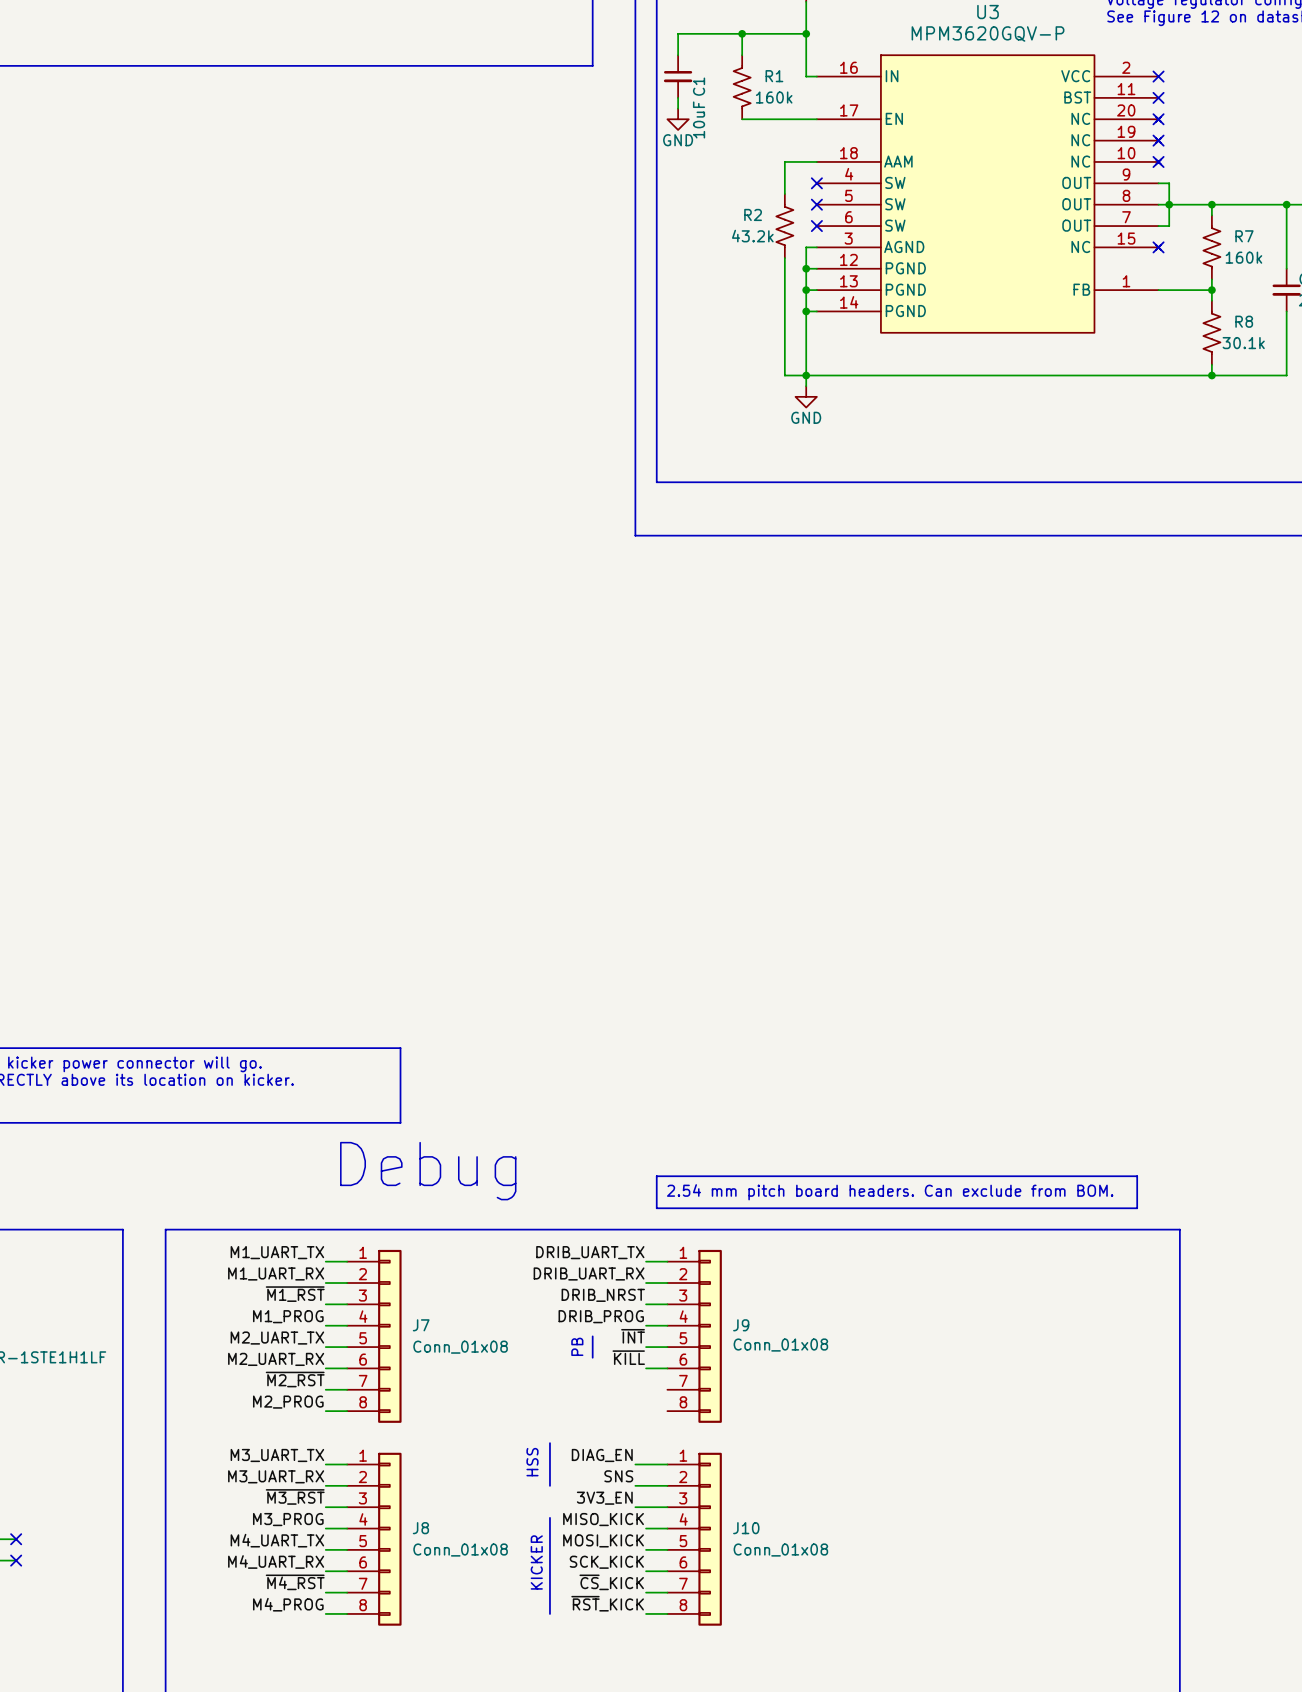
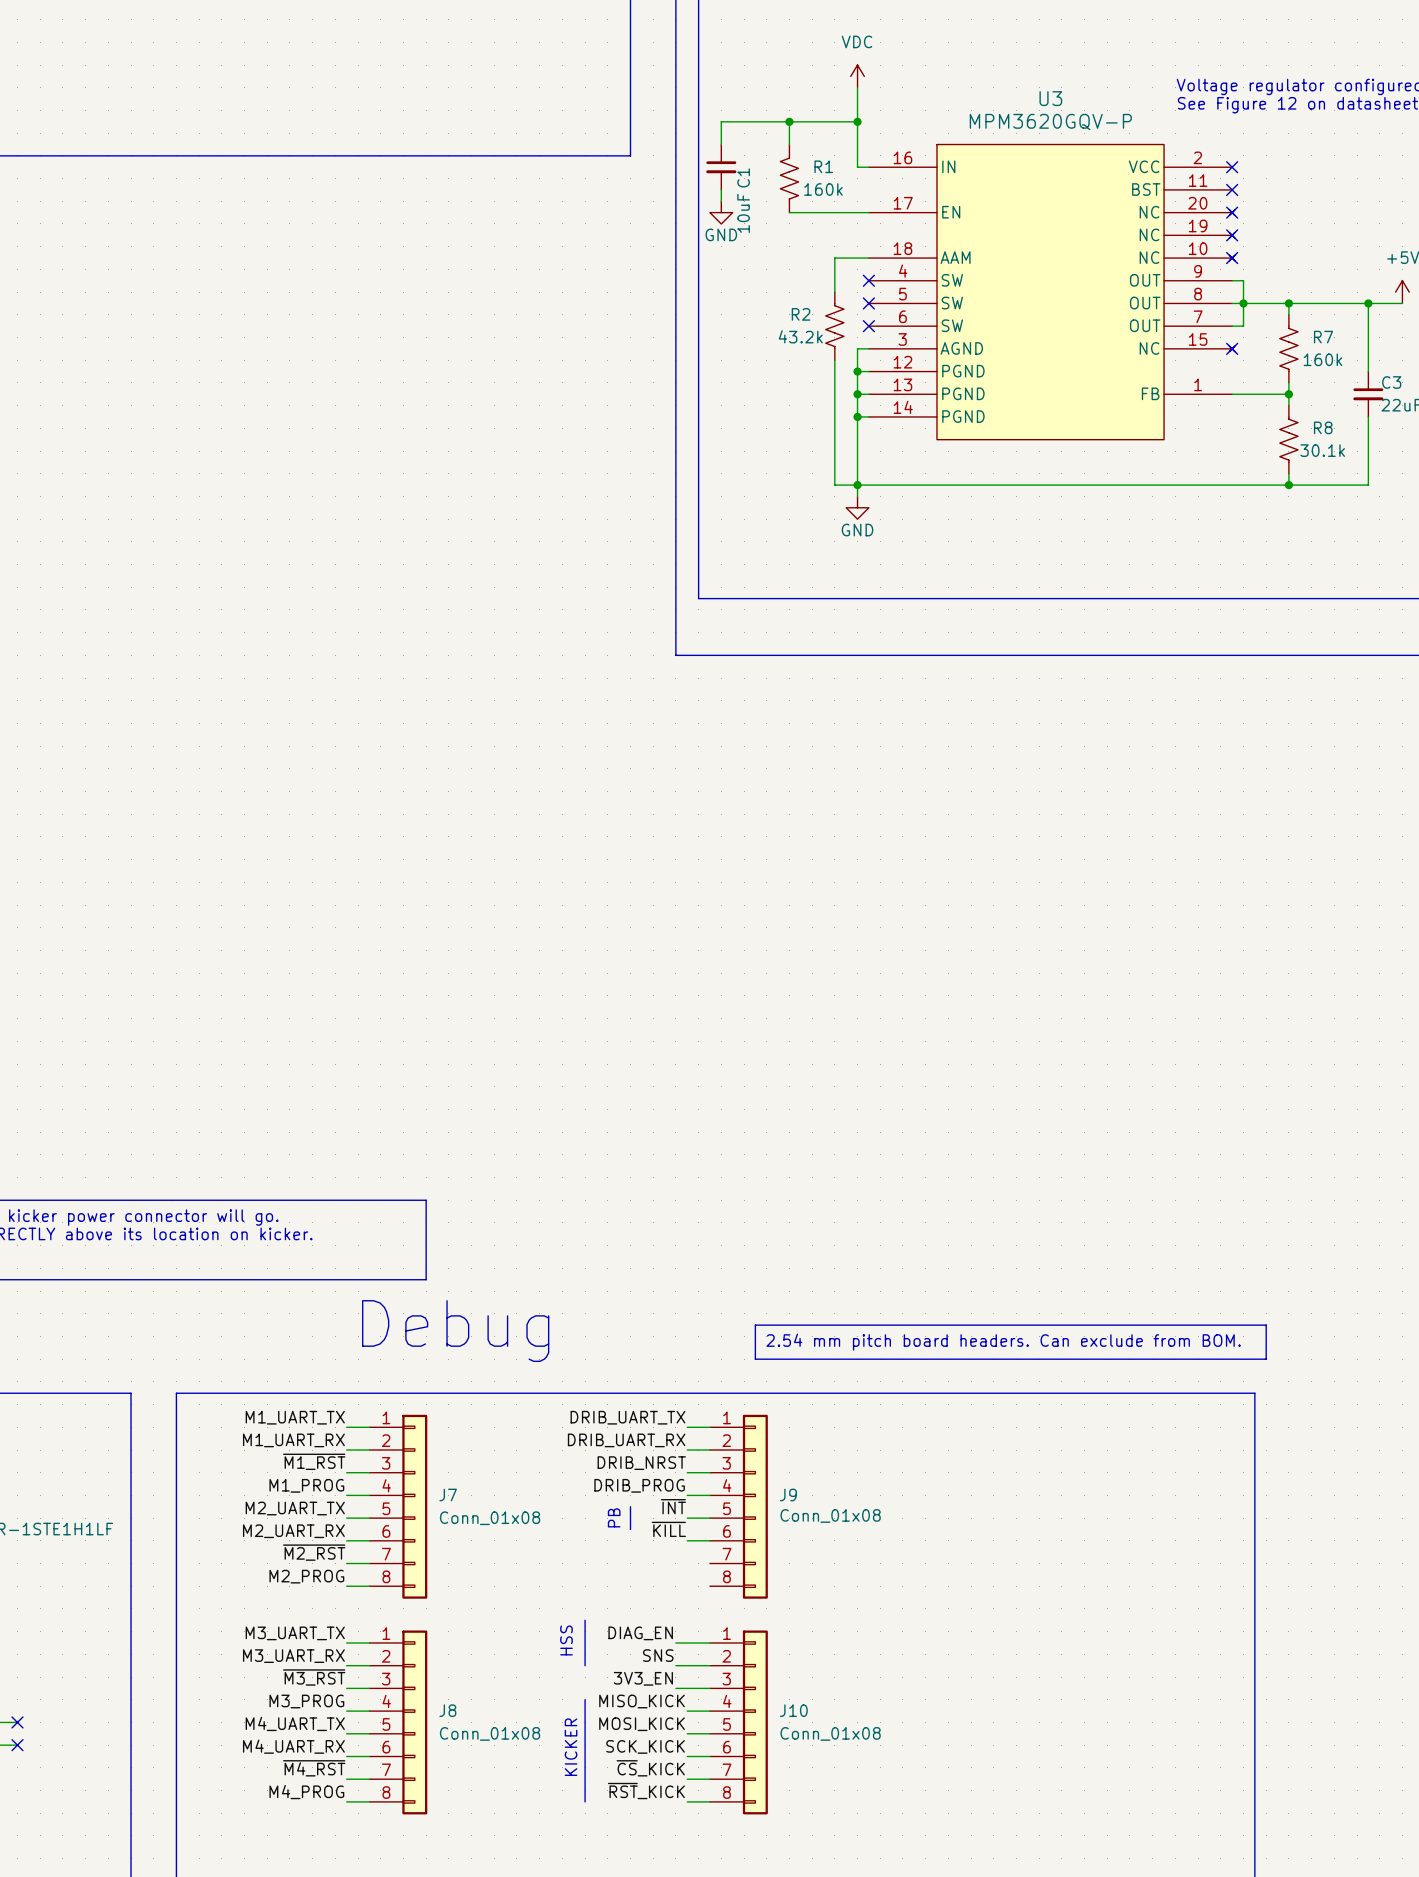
line: (656, 1176) (1137, 1176) (1137, 1208) (656, 1208) (656, 1176) -> (755, 1325) (1266, 1325) (1266, 1359) (755, 1359) (755, 1325)
text position: 2.54 mm pitch board headers. Can exclude from BOM. (890, 1192) -> 2.54 mm pitch board headers. Can exclude from BOM. (1003, 1342)

